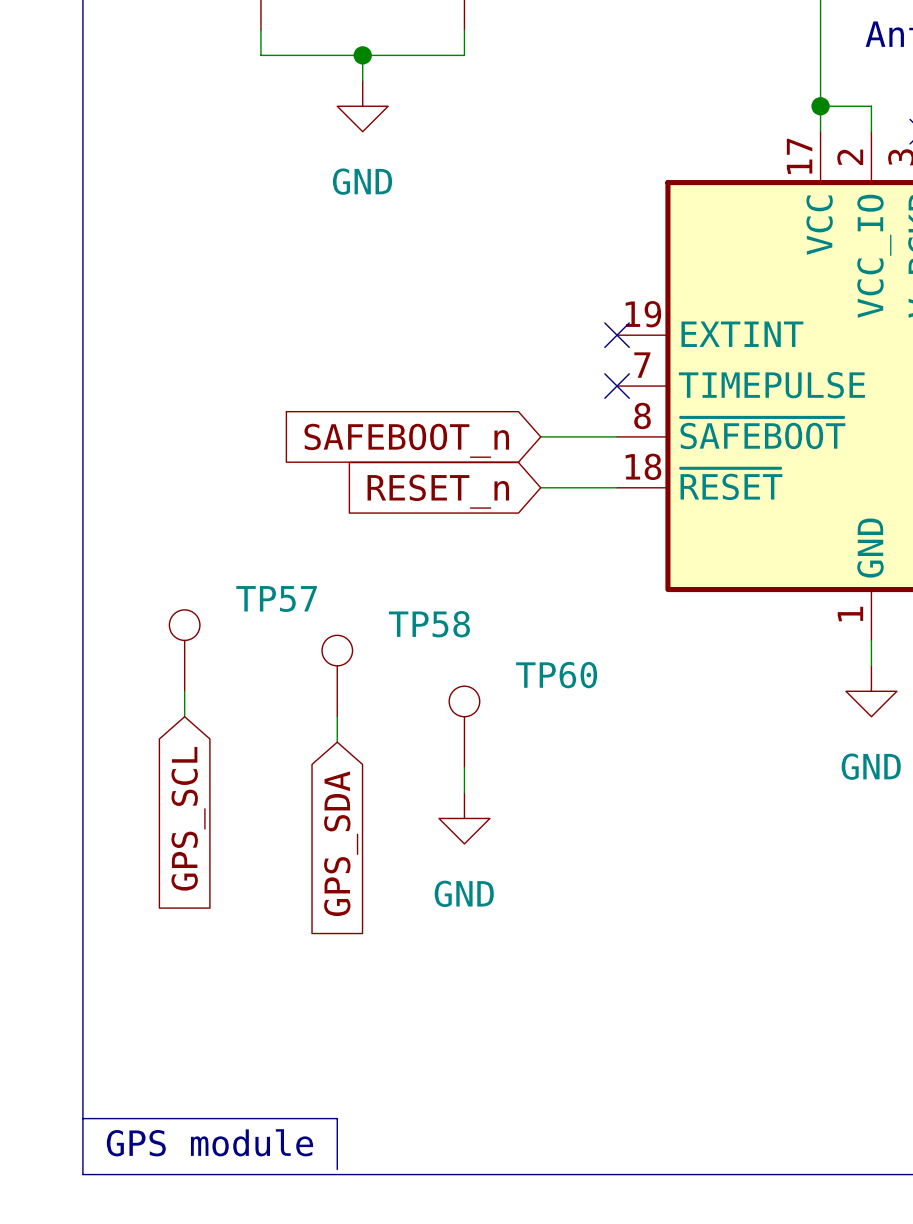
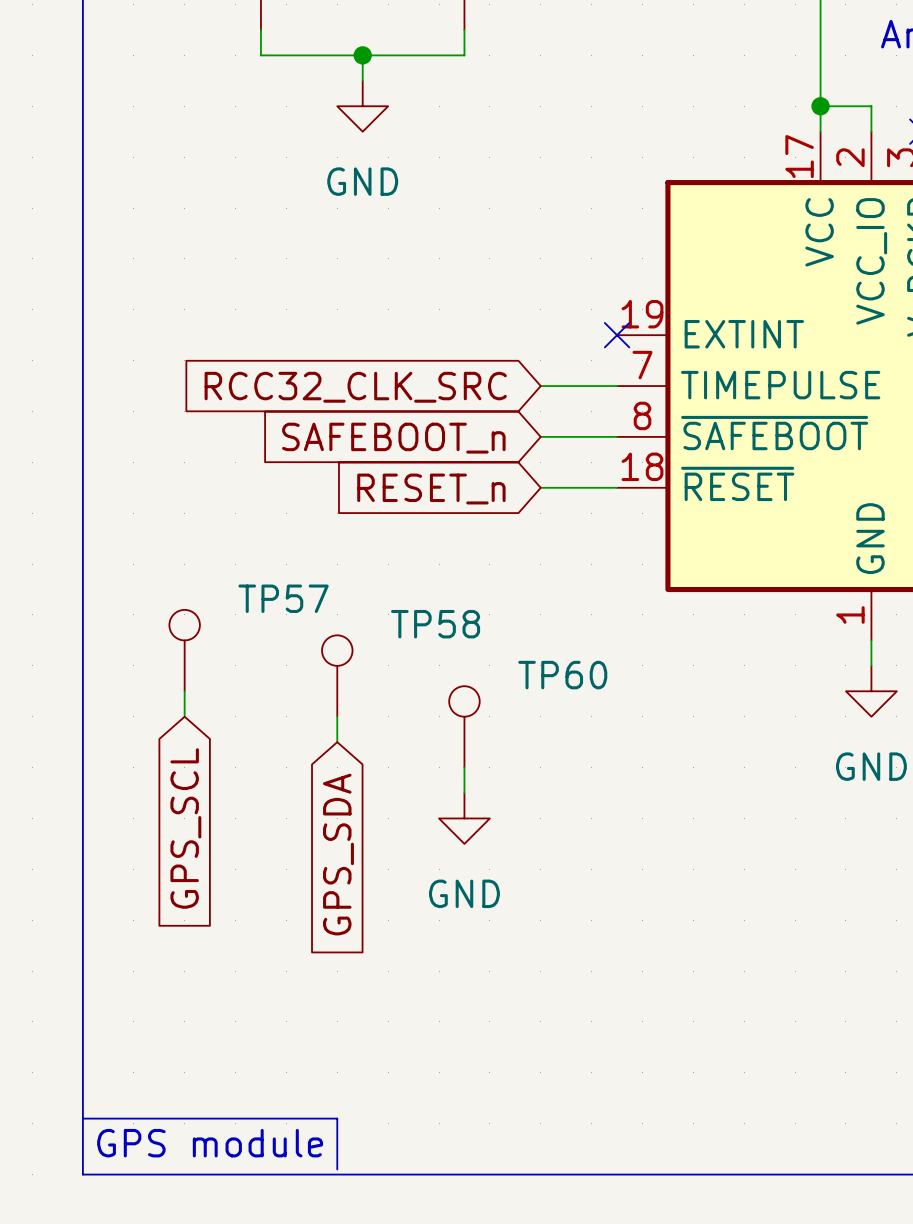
wire: none -> (540, 386) (617, 386)
no-connect mark: (617, 386) -> none
global label: none -> RCC32_CLK_SRC (355, 387)

